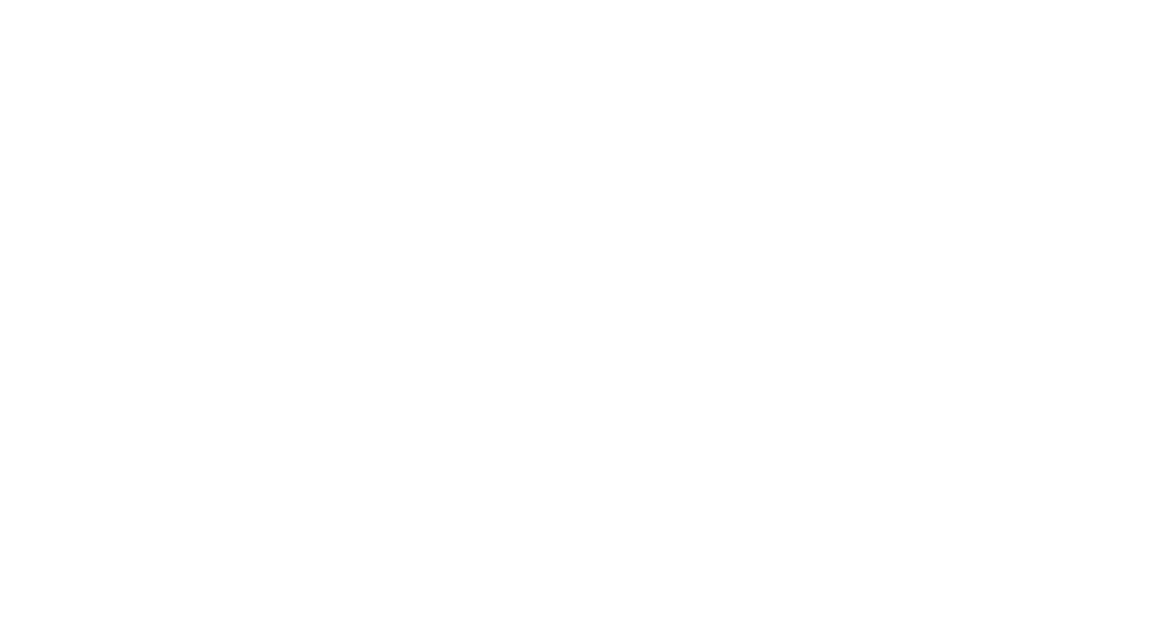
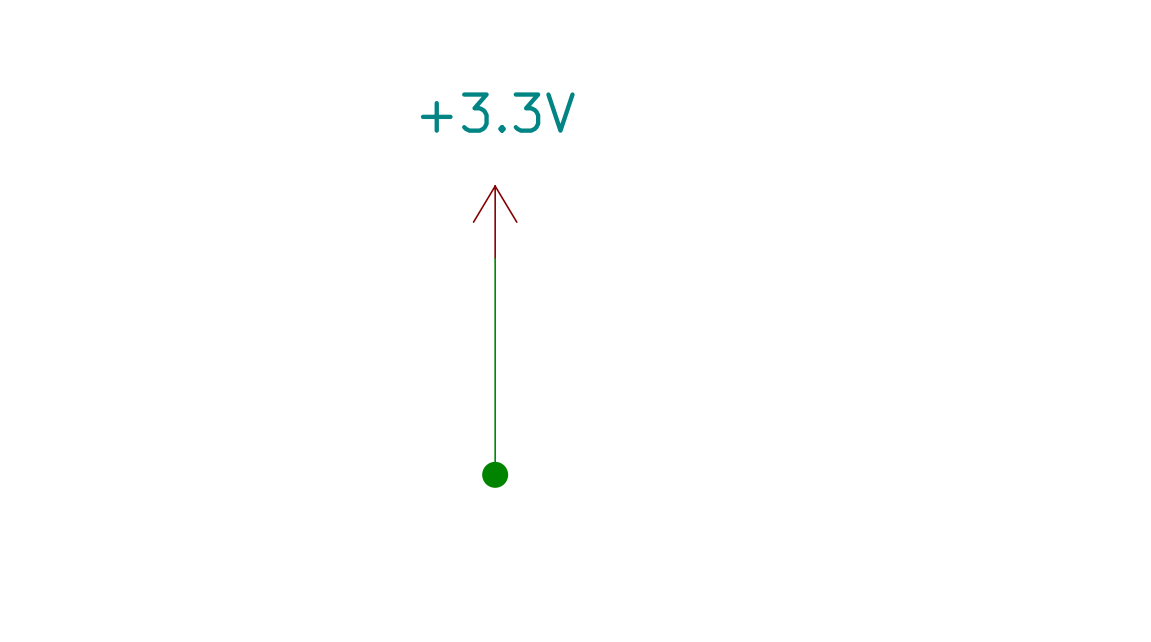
power symbol: none -> +3.3V (495, 222)
wire: none -> (495, 258) (495, 474)
junction: none -> (495, 474)

